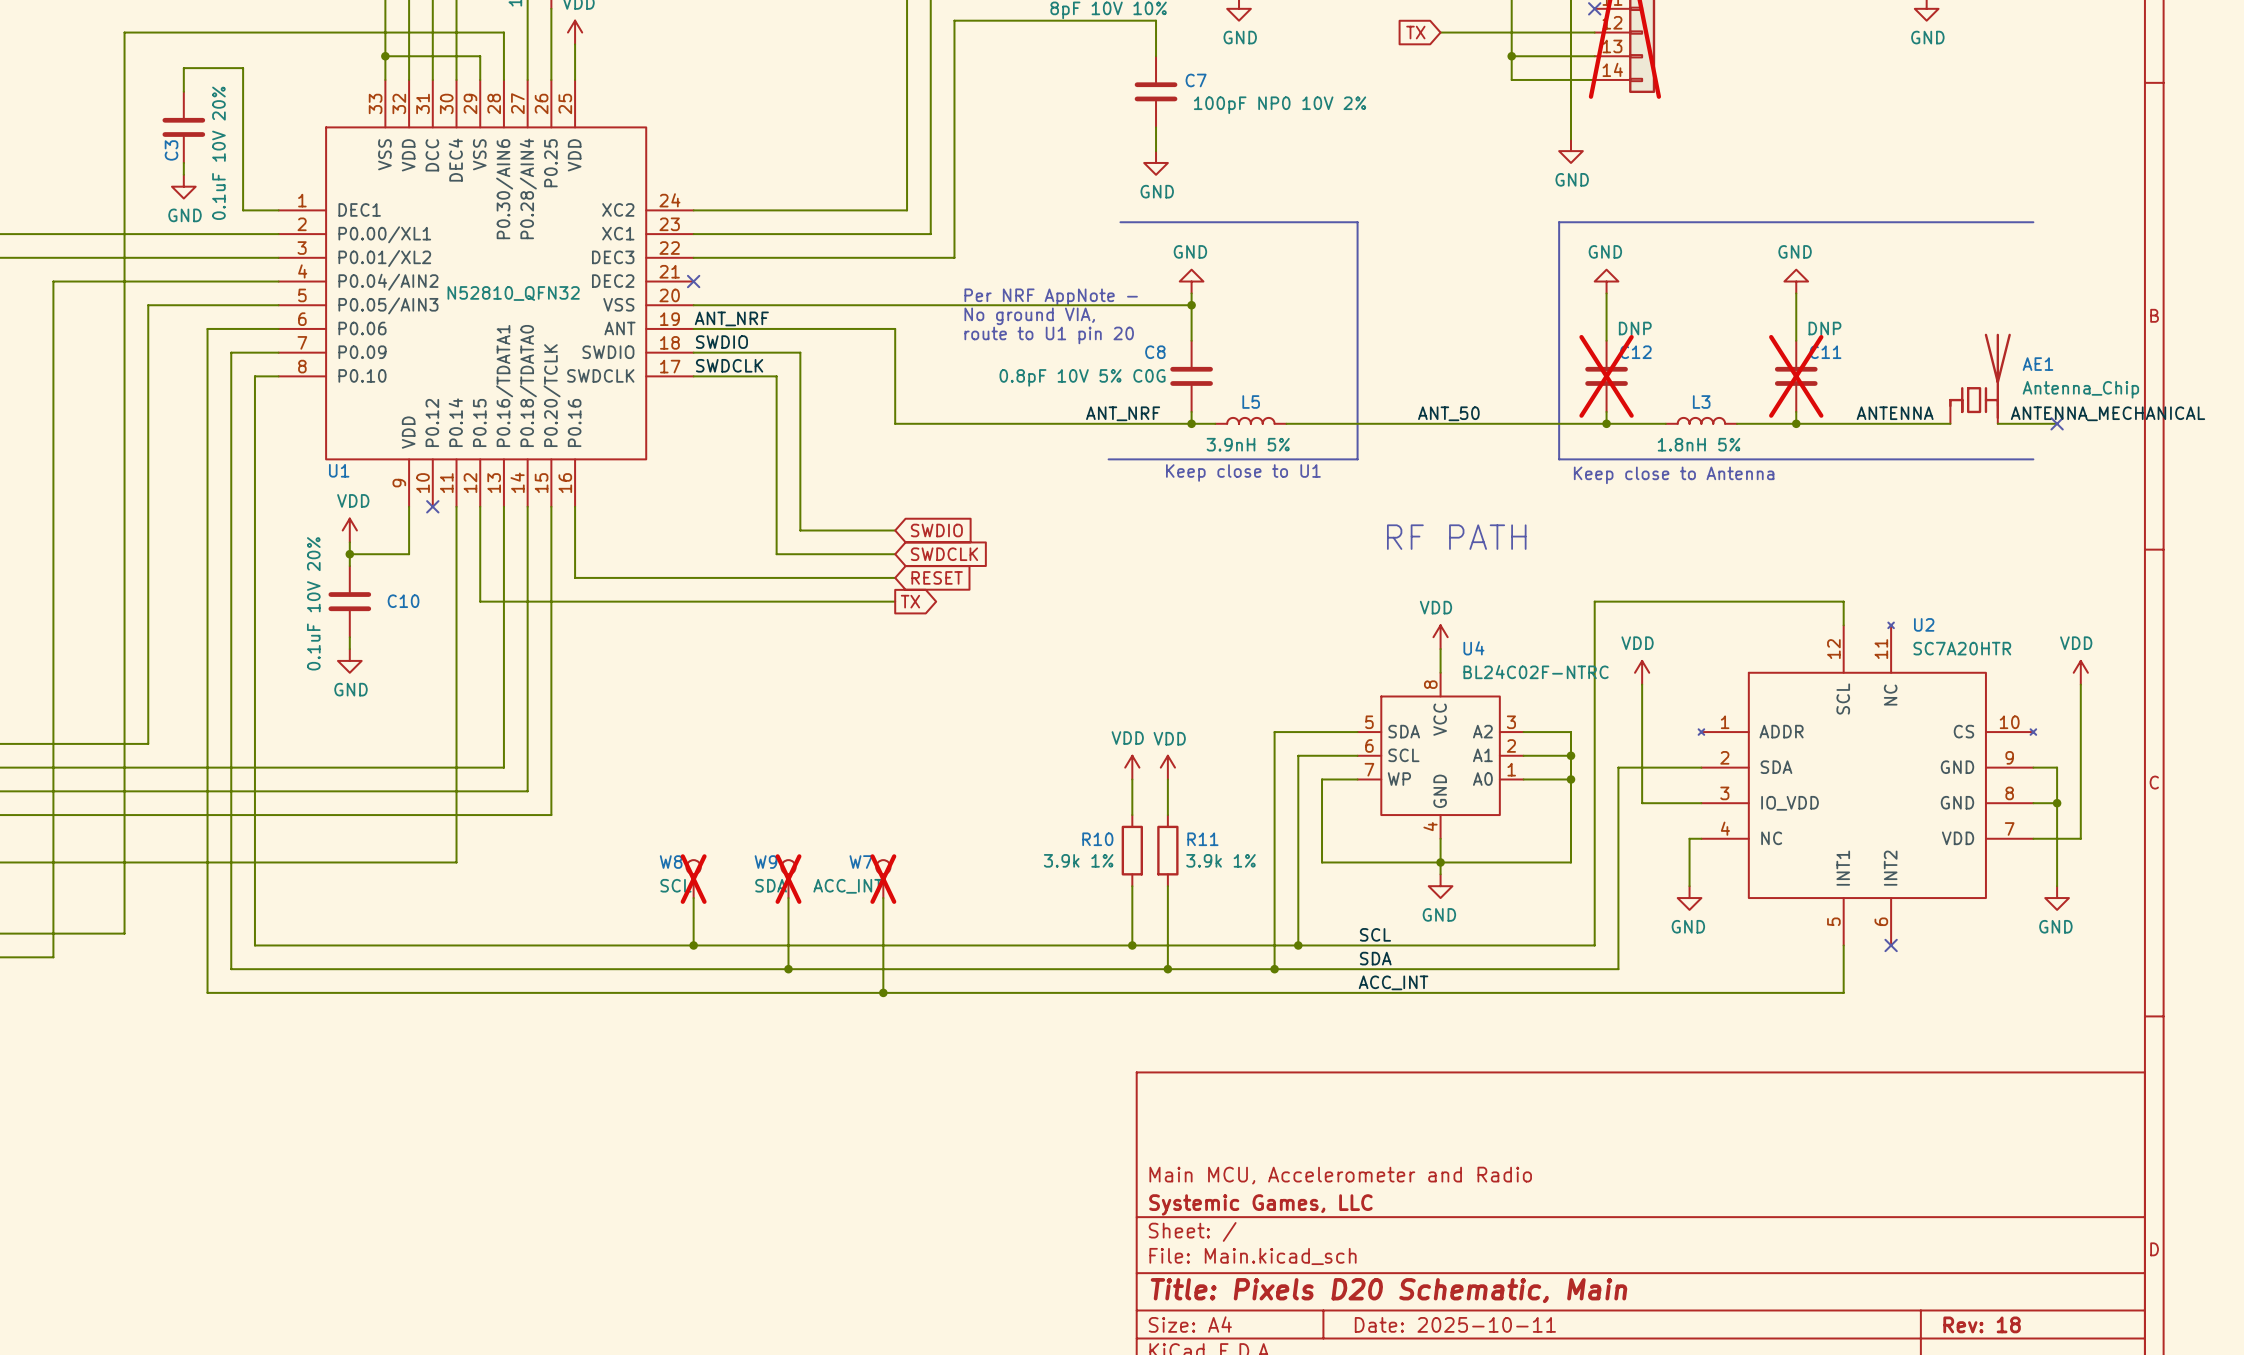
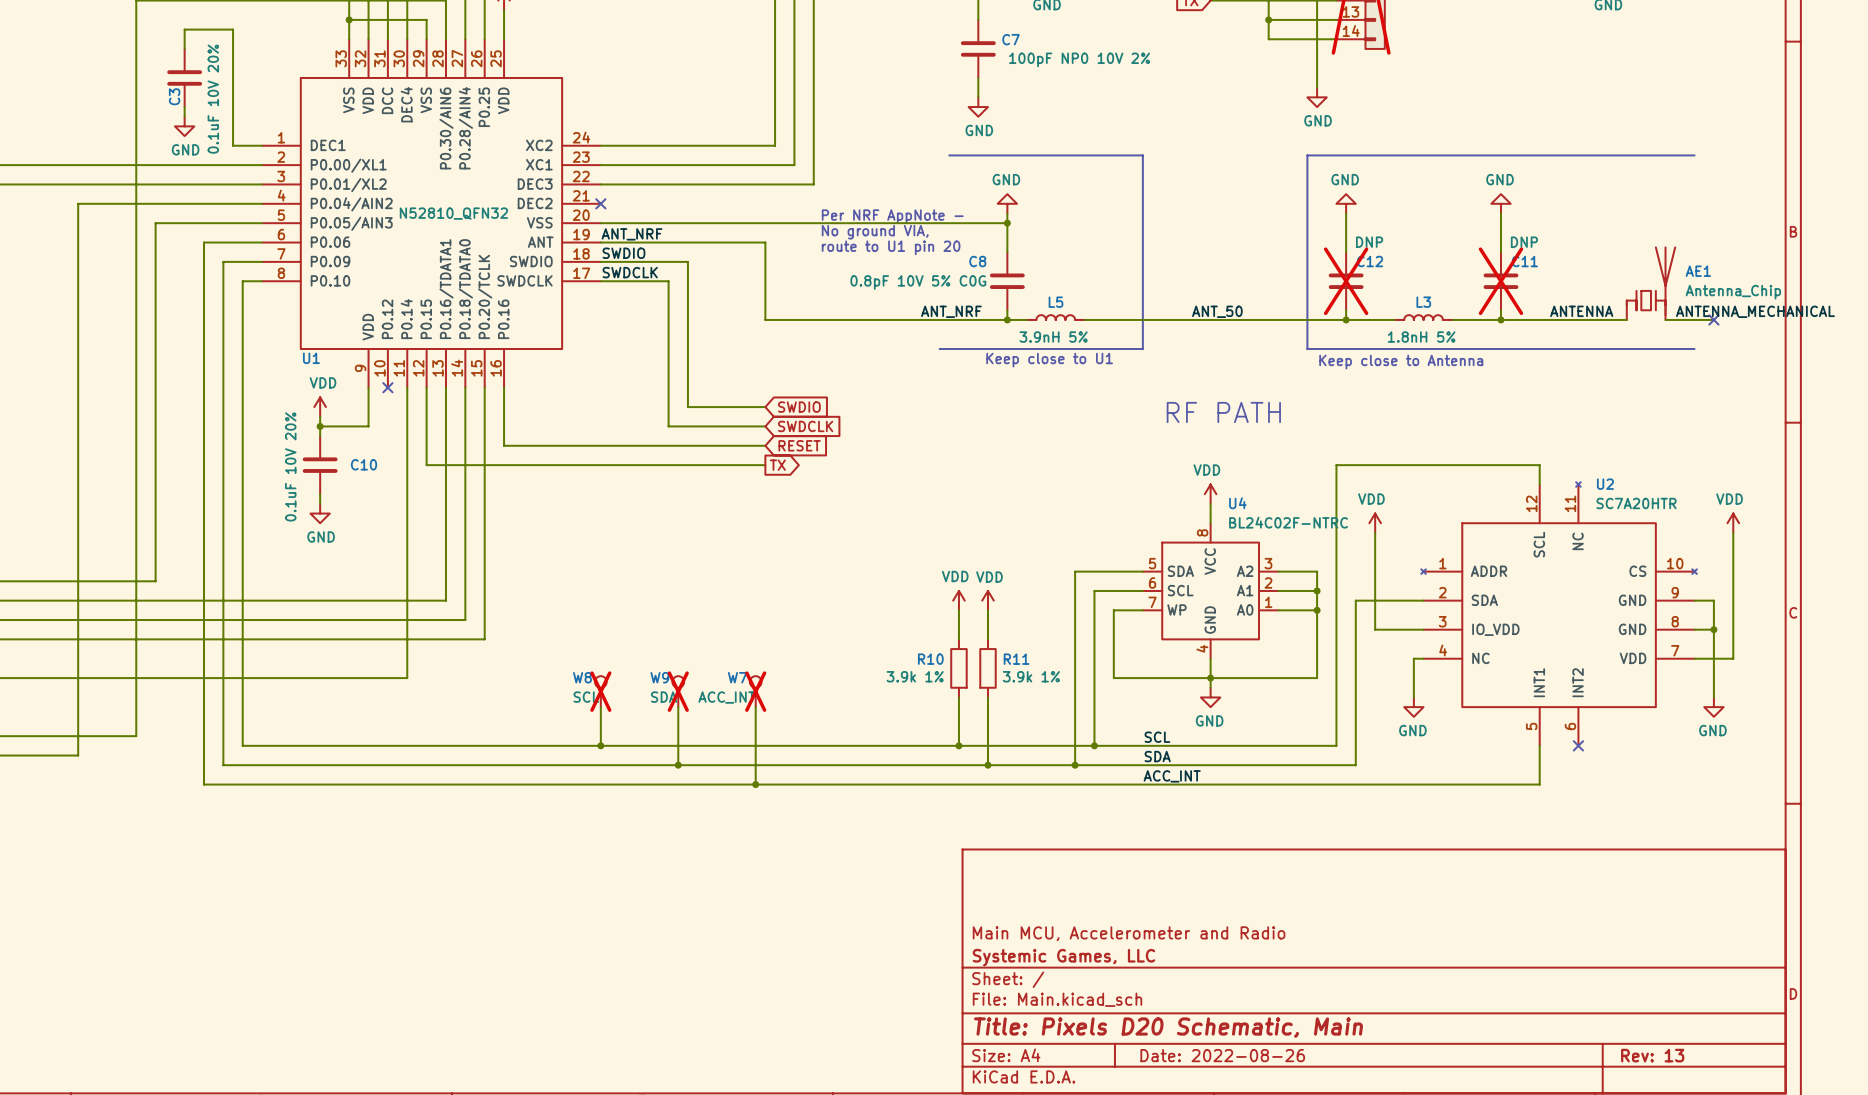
title block: Date: 2025-10-11 (1455, 1324) -> Date: 2022-08-26 (1222, 1055)
title block: Rev: 18 (1982, 1324) -> Rev: 13 (1652, 1055)

